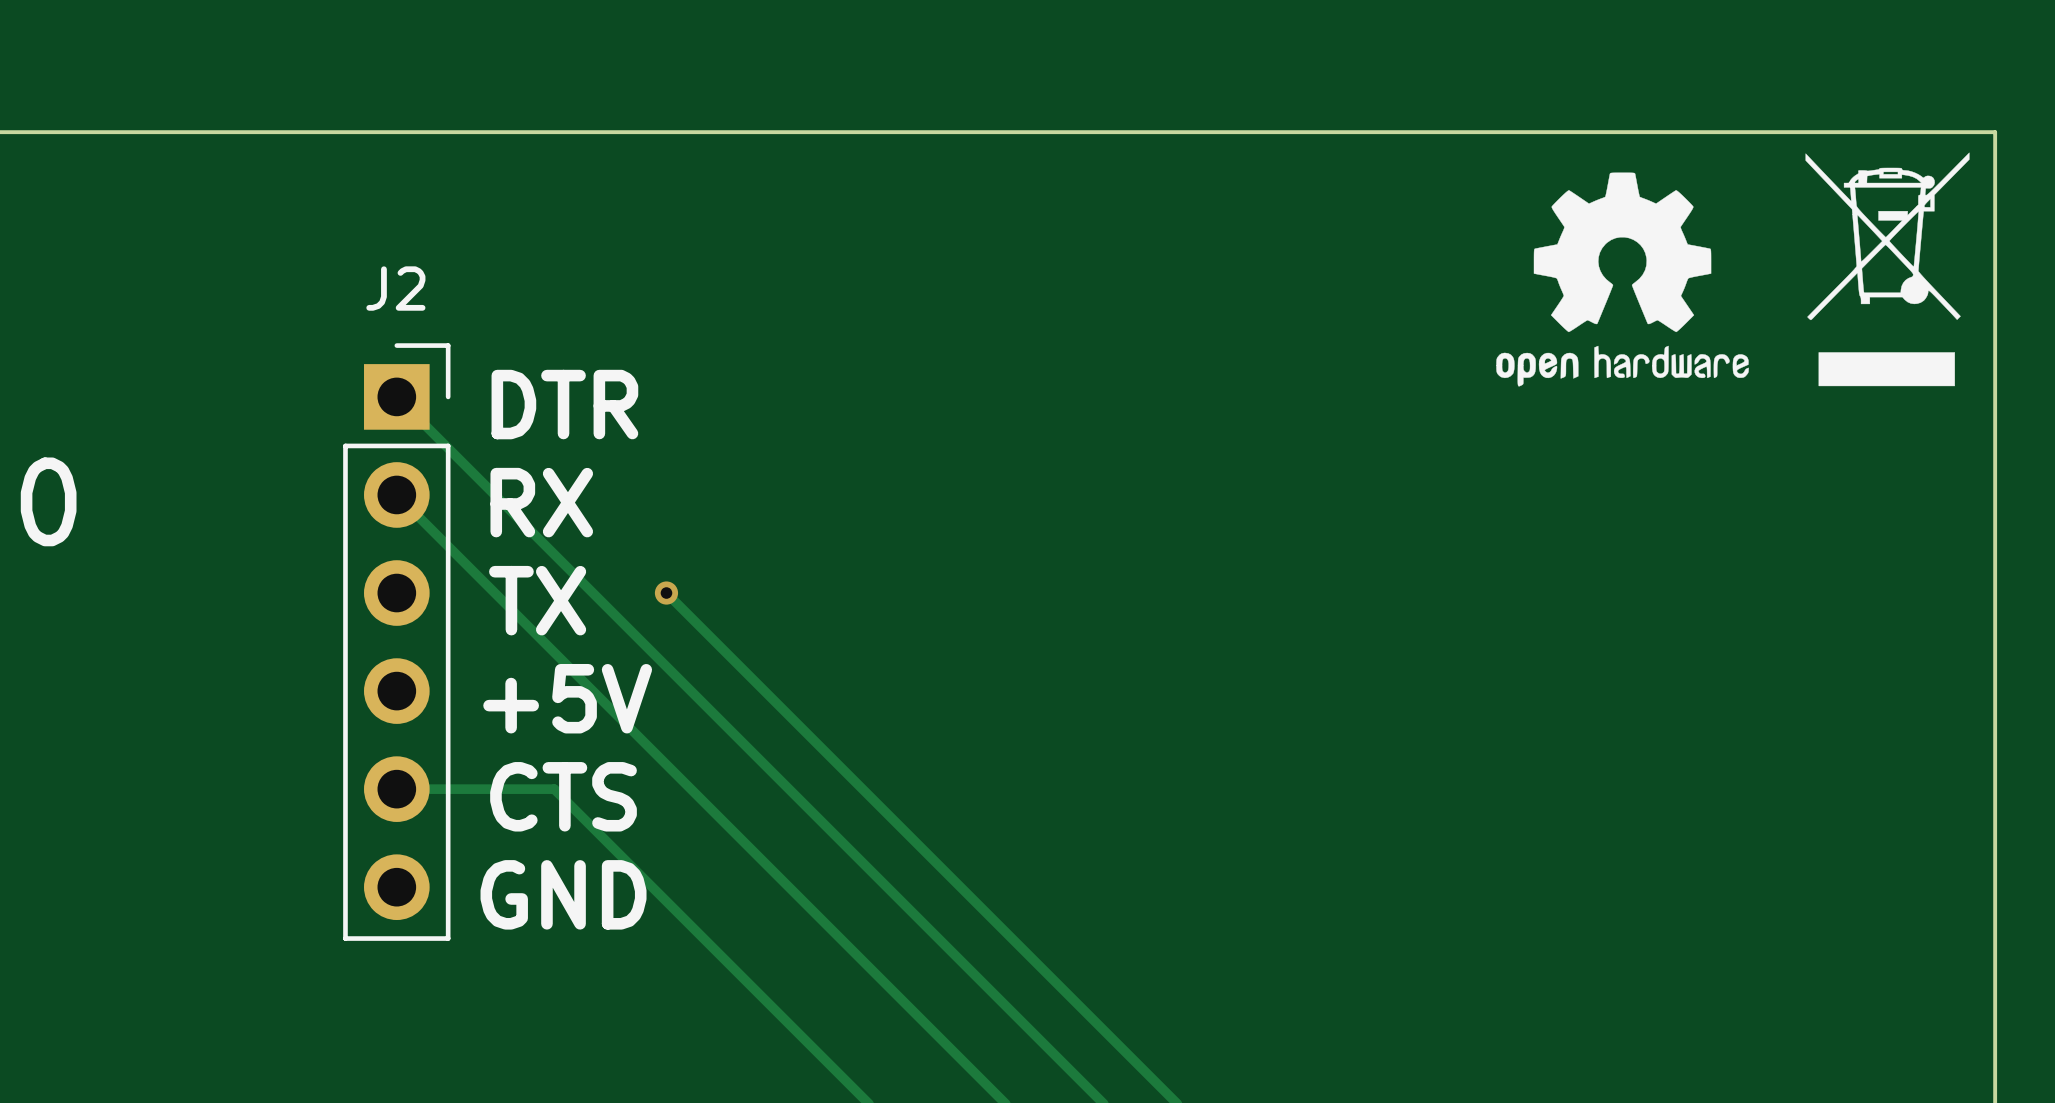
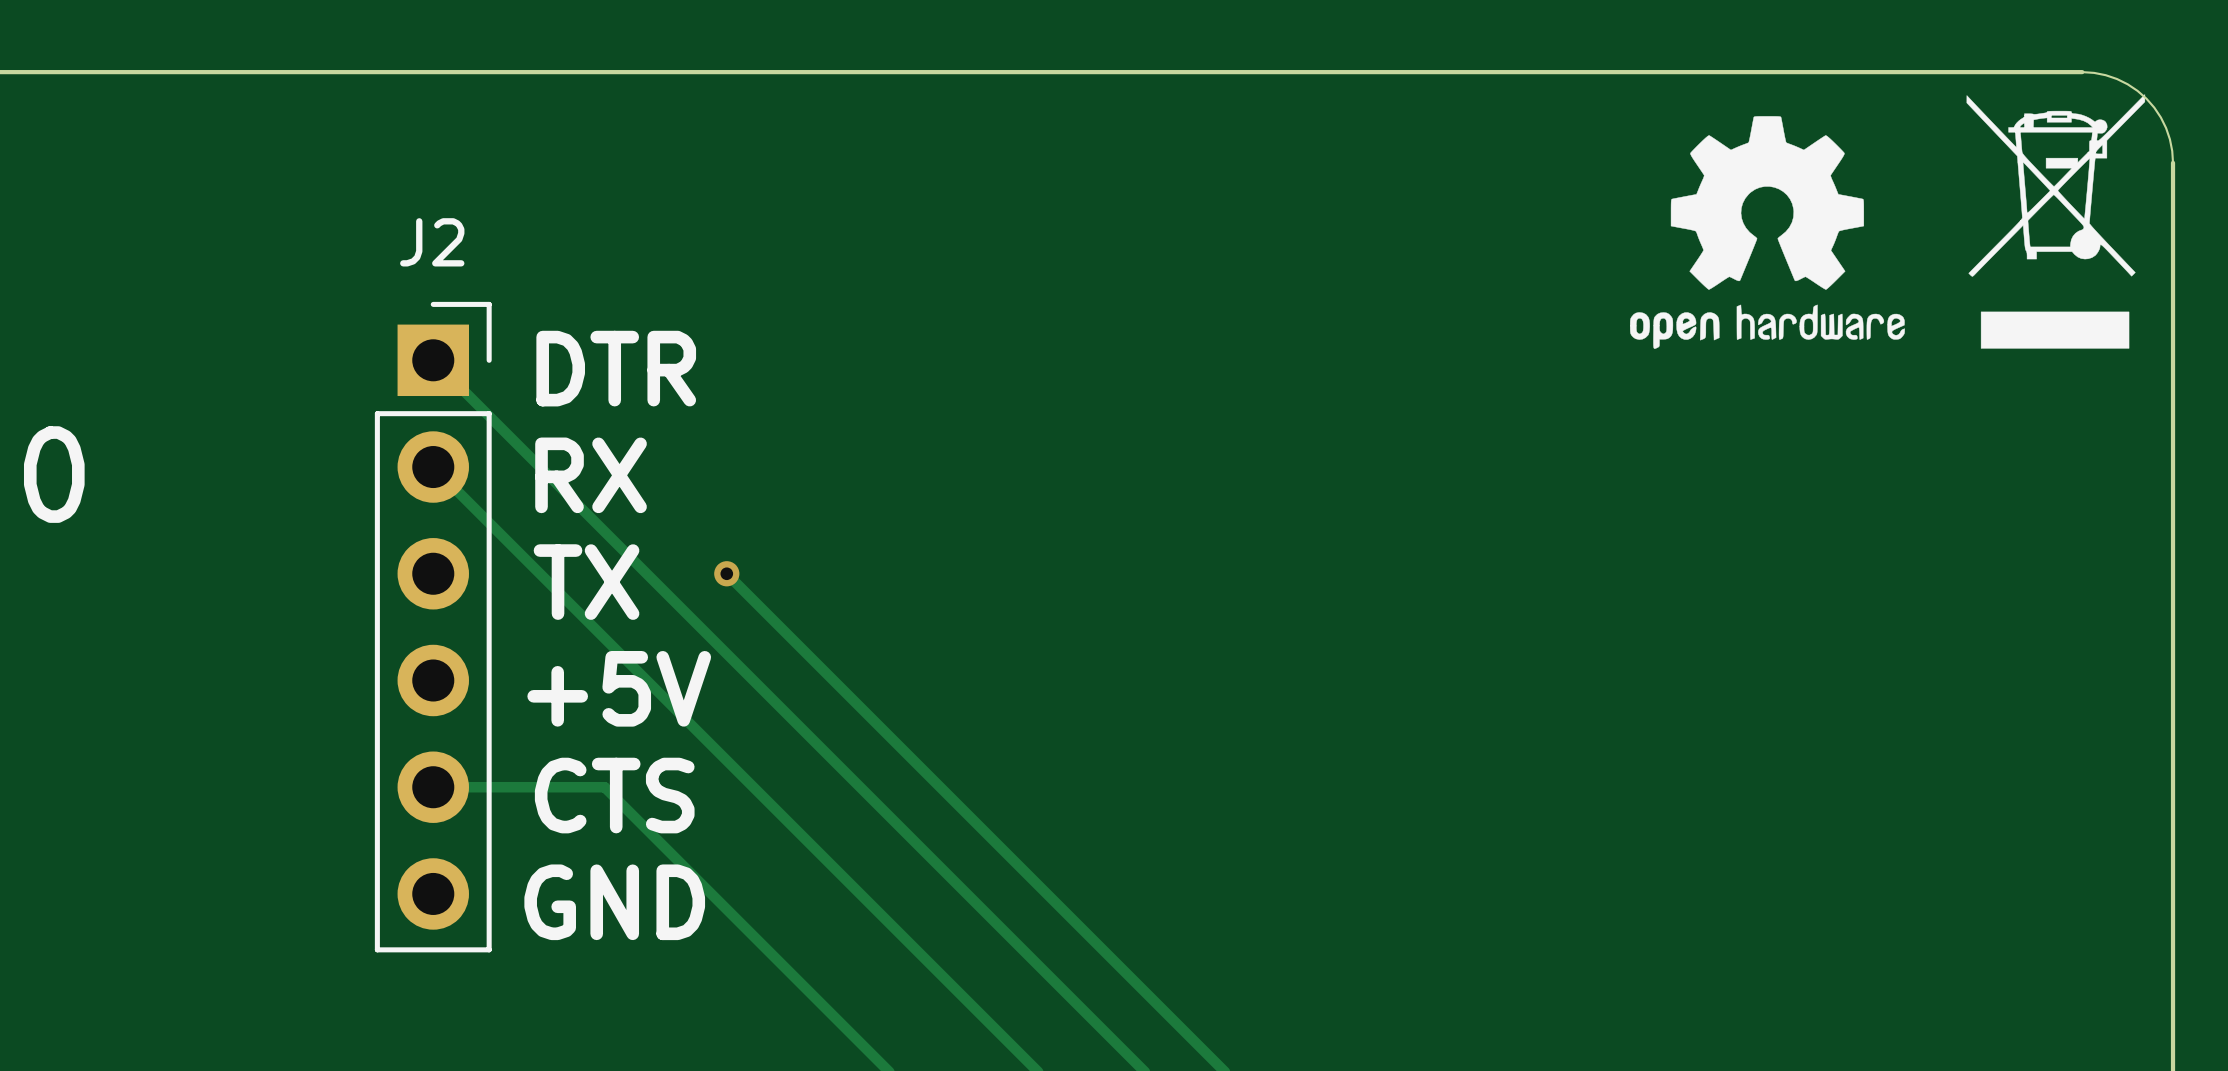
board edge: (1911, 132) (1995, 132) (1995, 215) -> (2082, 72) (2094, 72) (2117, 79) (2137, 90) (2146, 98) (2154, 107) (2166, 128) (2172, 151) (2173, 162)

